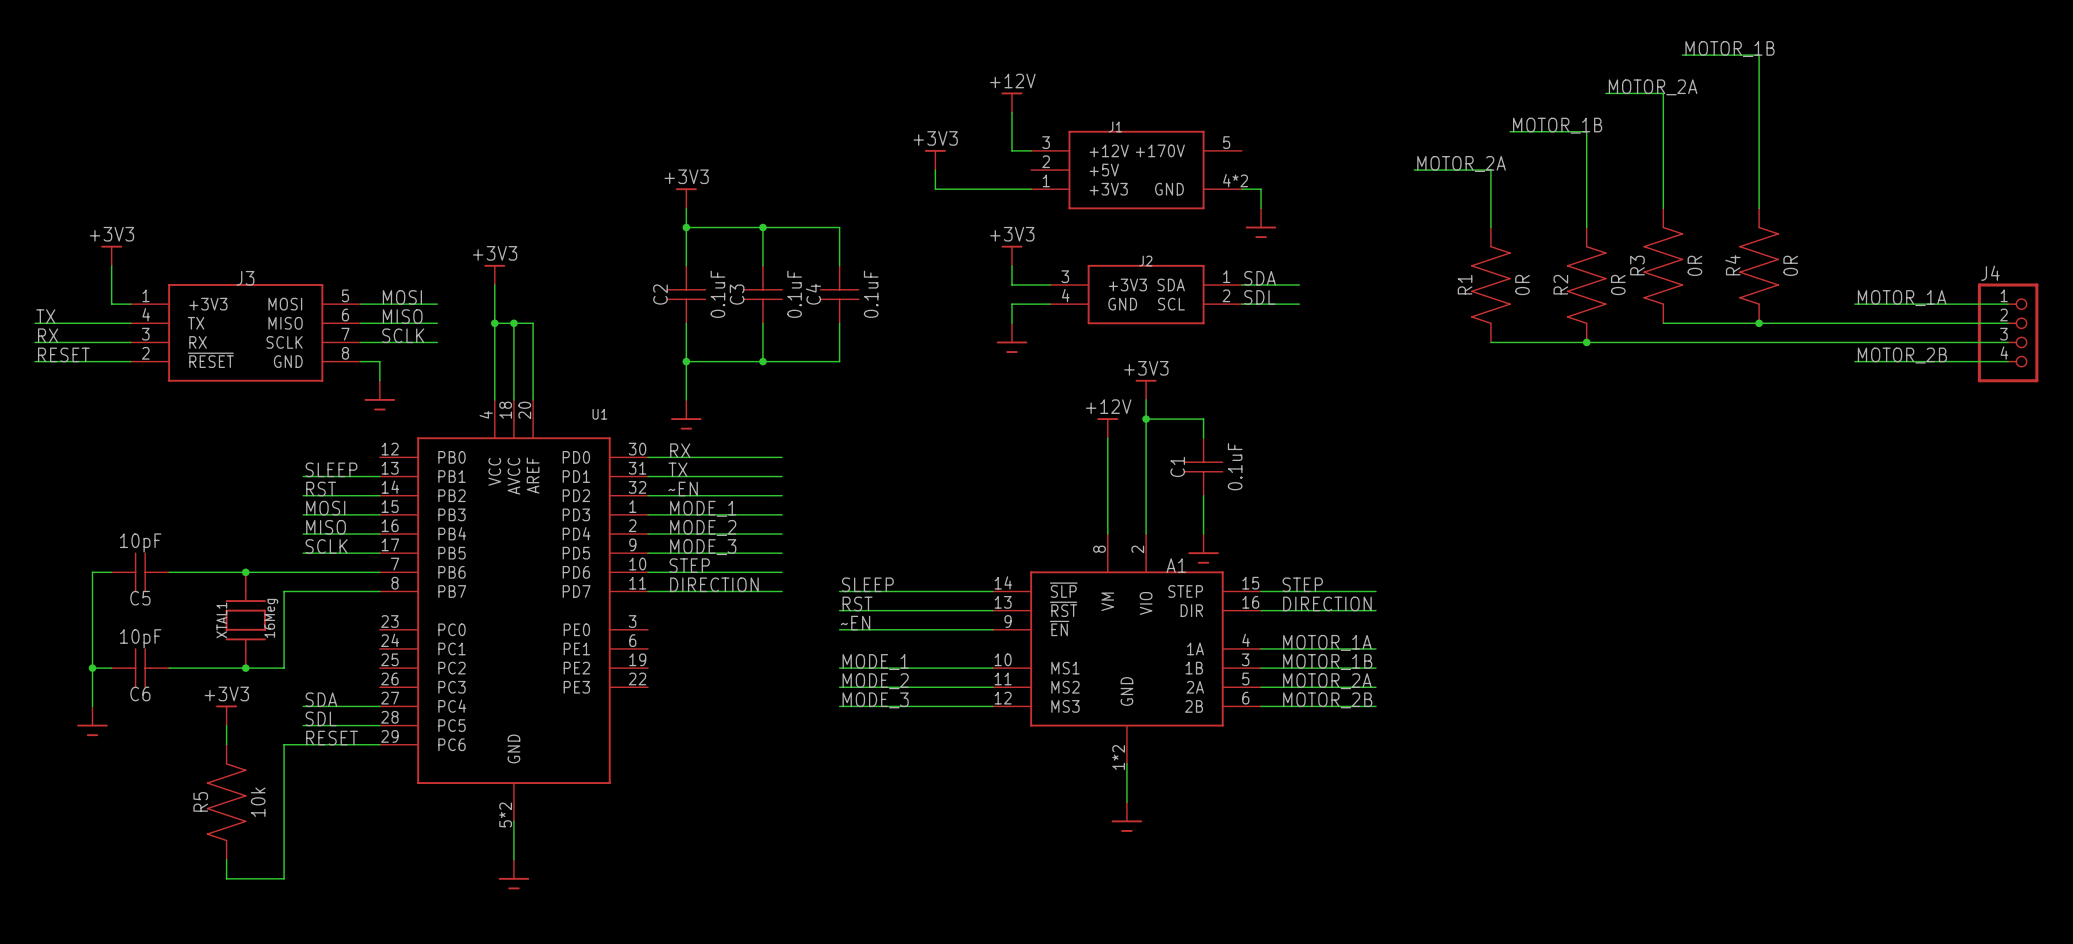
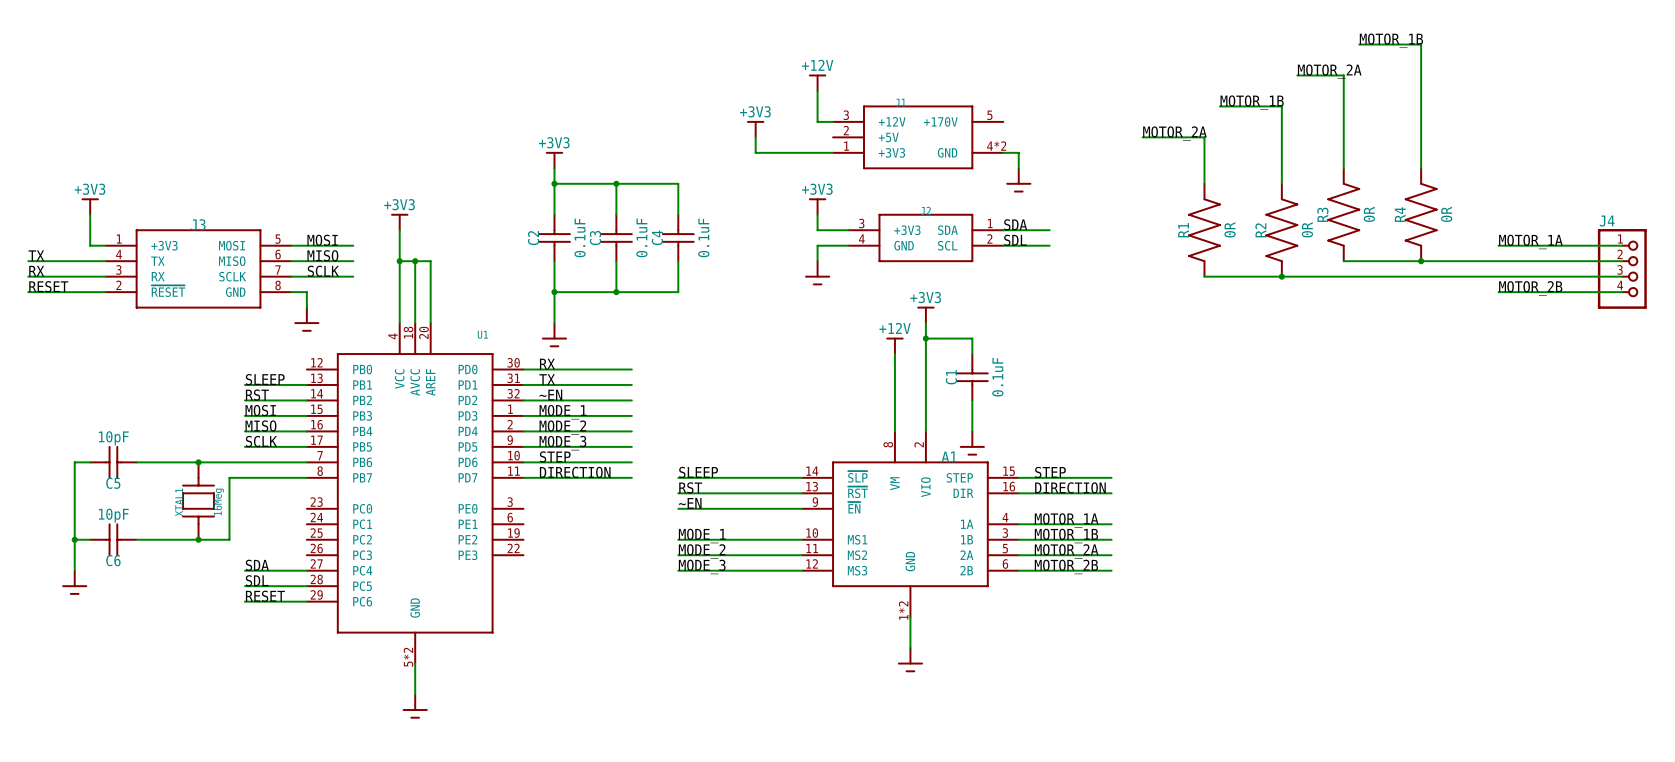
power symbol: +3V3 (226, 715) -> none
wire: (226, 725) (226, 744) -> none
wire: (303, 744) (284, 744) (284, 878) (226, 878) (226, 859) -> none
R5: 10k (226, 802) -> none

